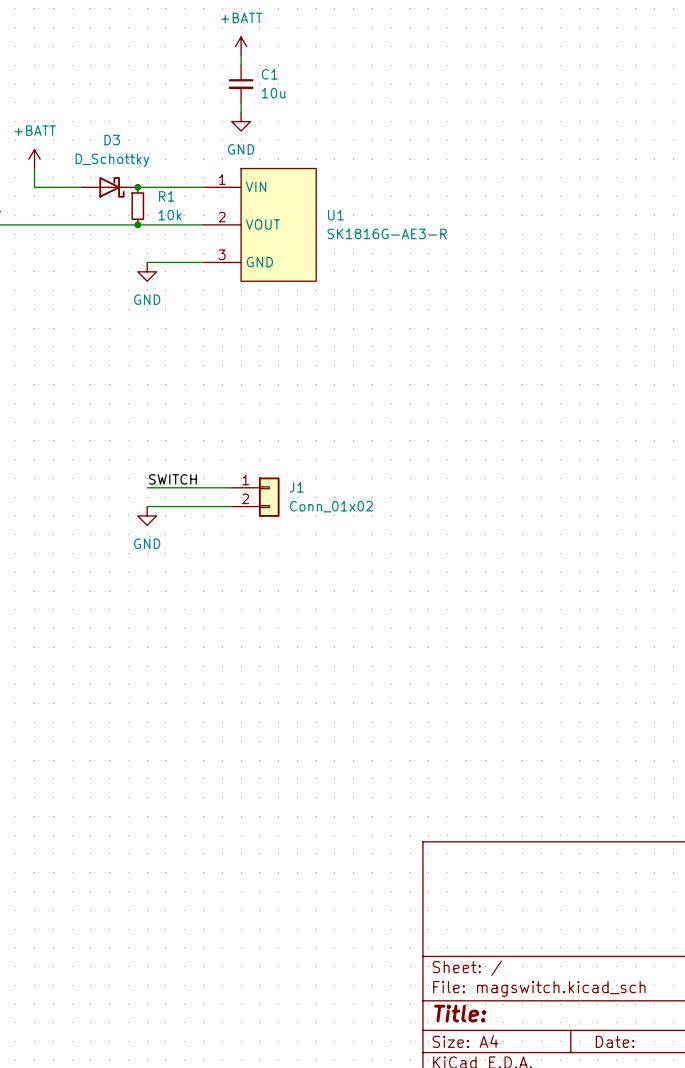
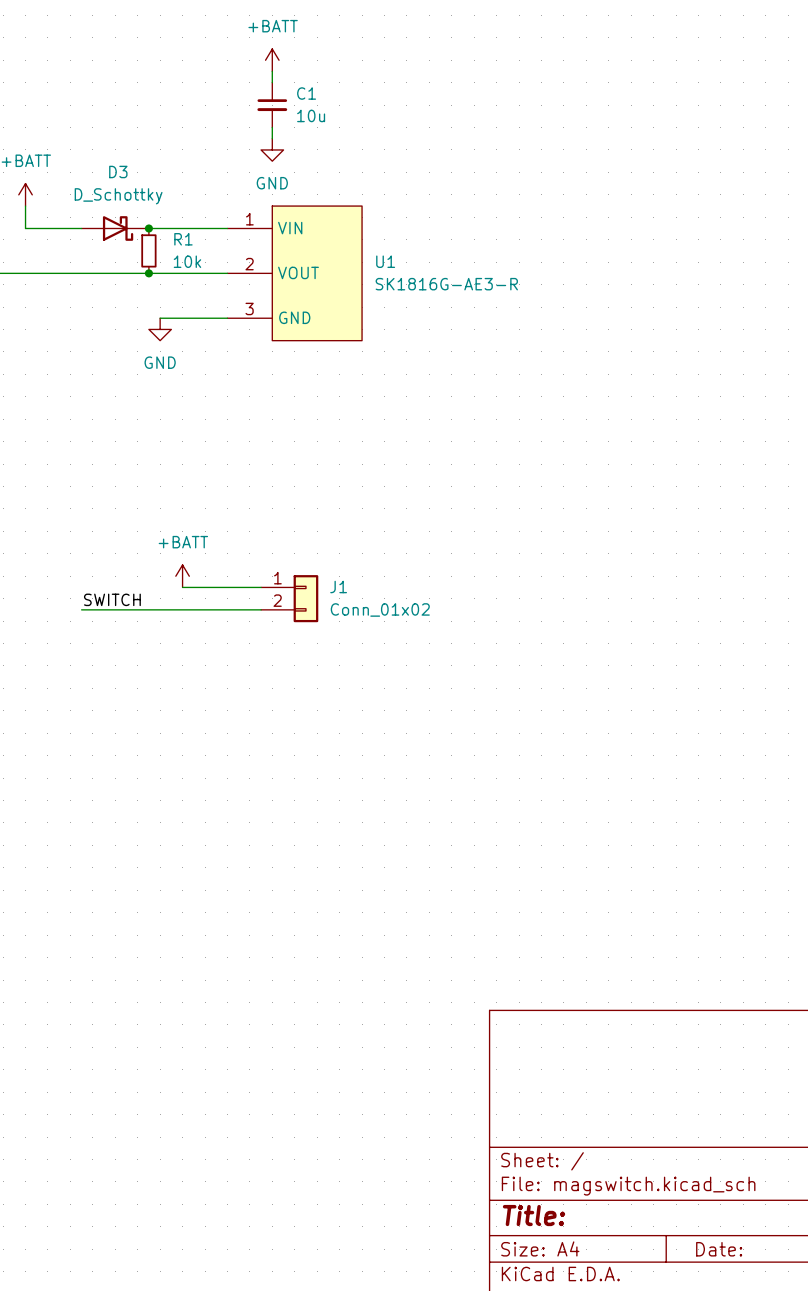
power symbol: none -> +BATT (182, 576)
label position: SWITCH (172, 479) -> SWITCH (112, 599)
wire: (147, 487) (165, 487) -> none
wire: none -> (81, 609) (160, 609)
power symbol: GND (147, 515) -> none

